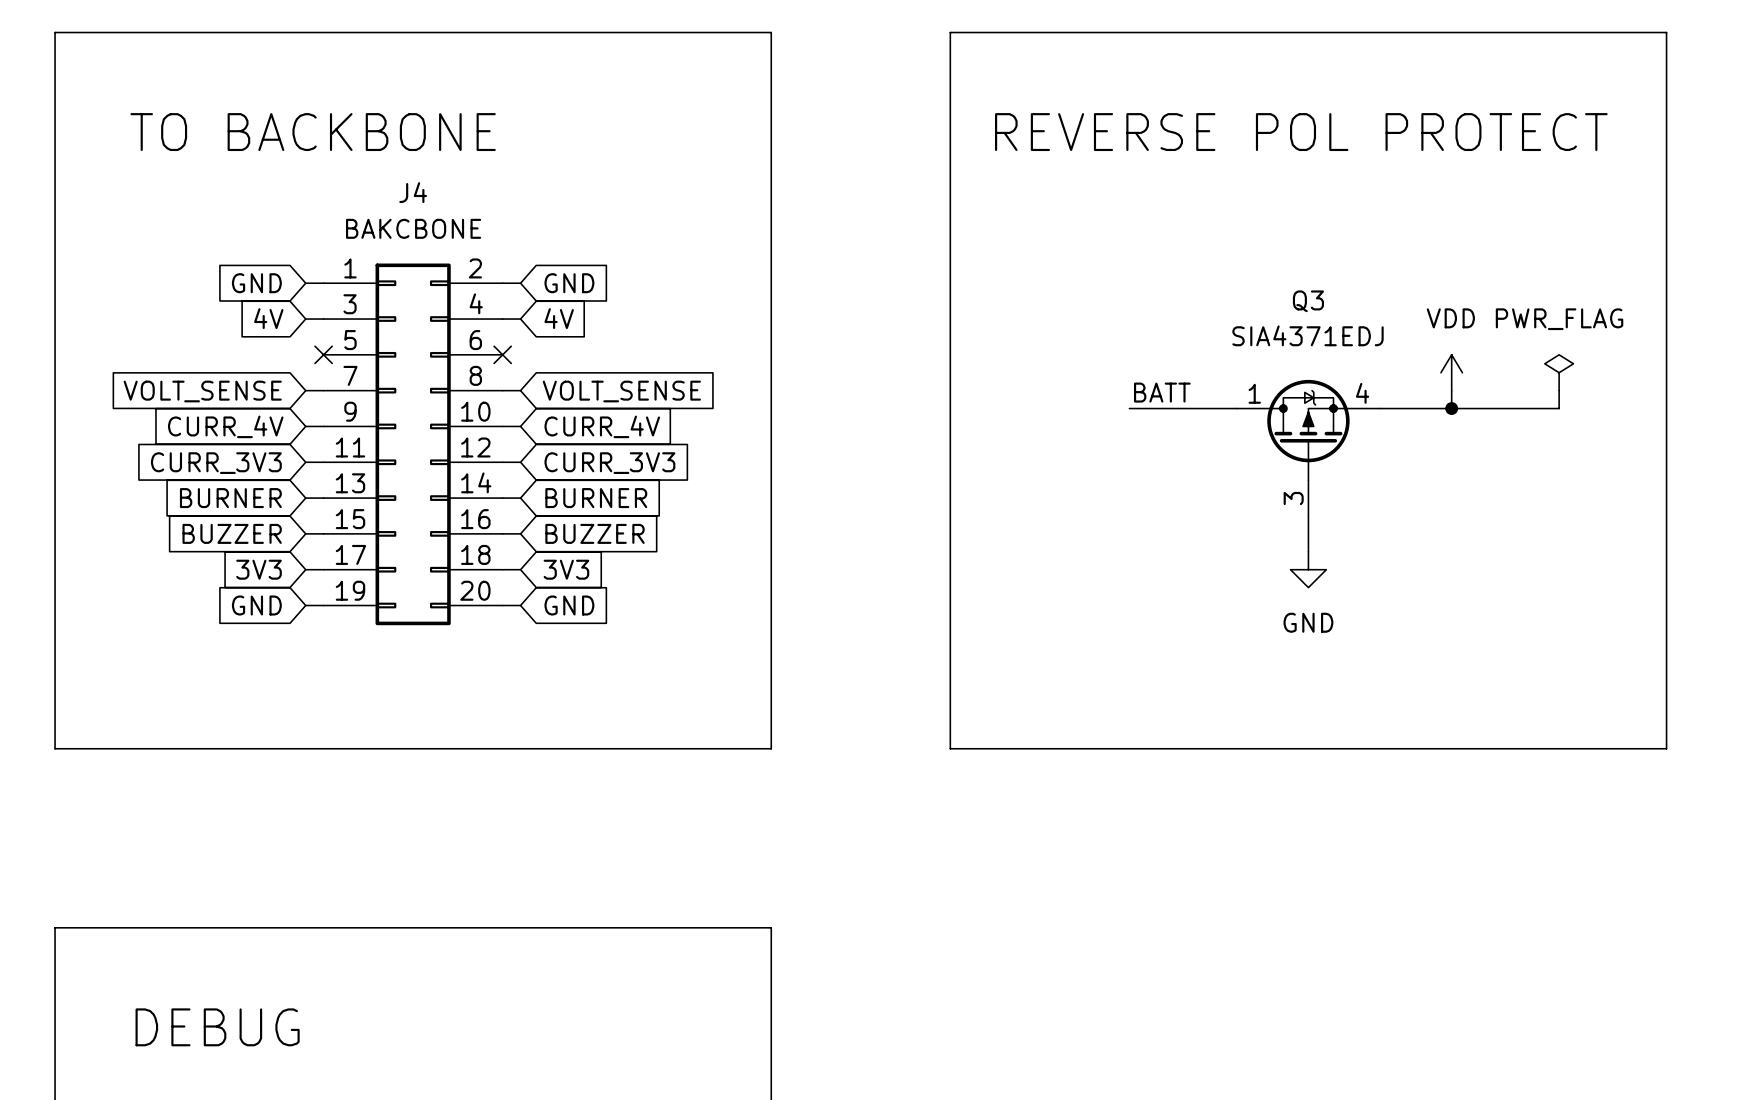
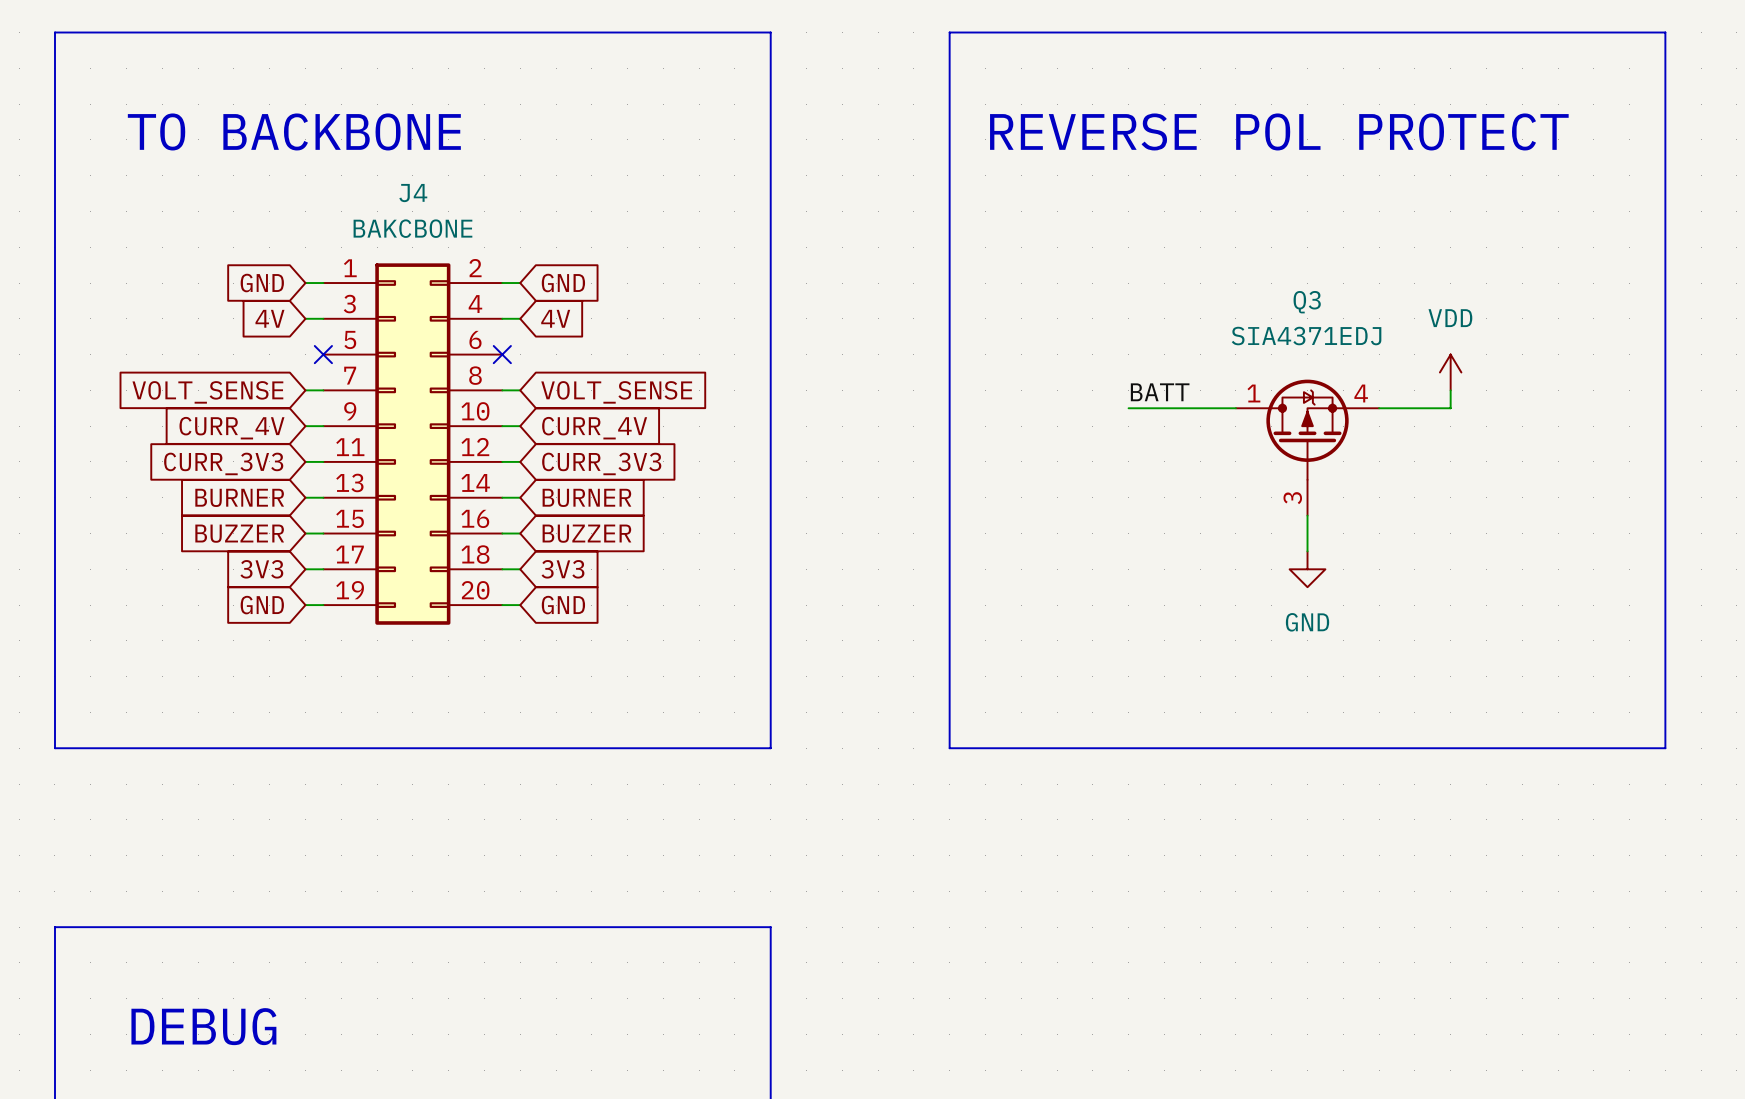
power symbol: PWR_FLAG (1559, 372) -> none
wire: (1559, 390) (1559, 408) (1451, 408) -> none
junction: (1451, 408) -> none

